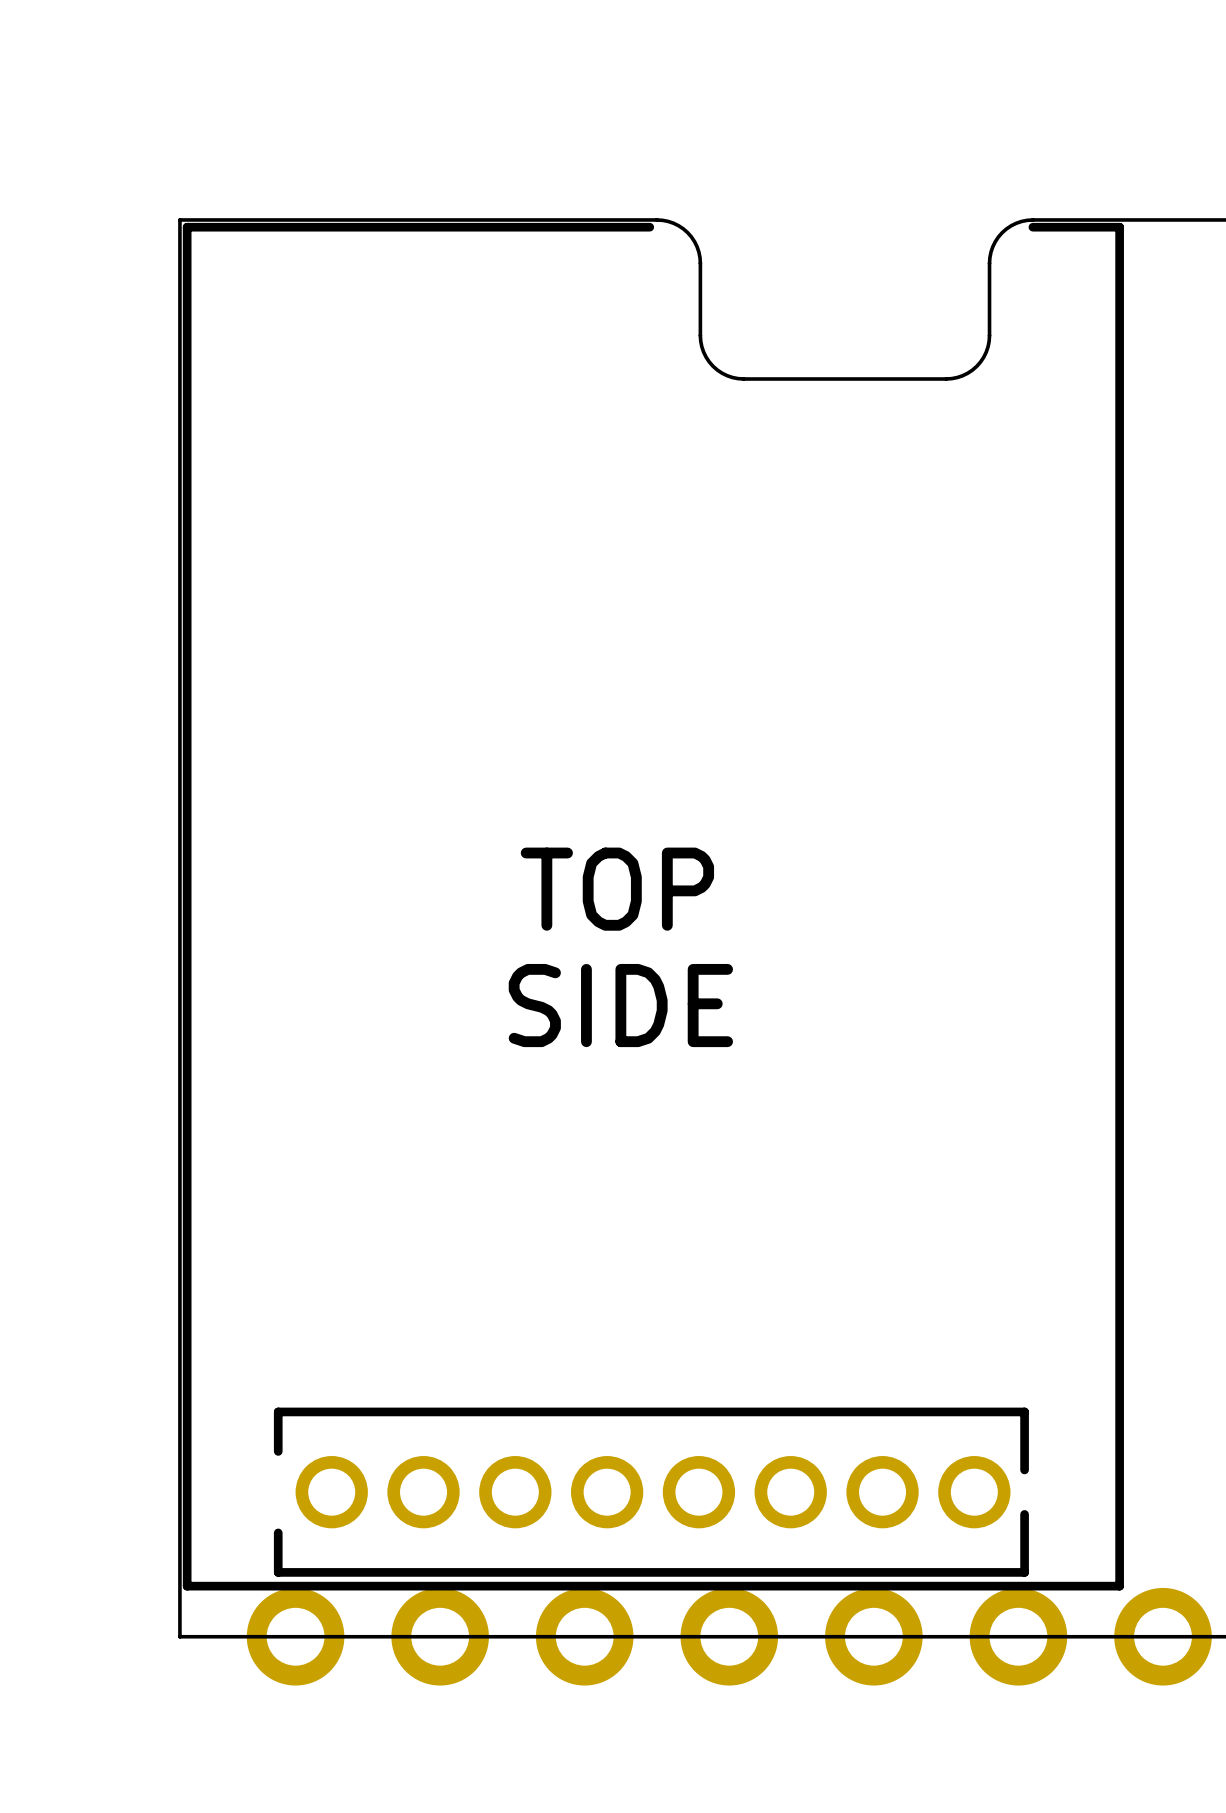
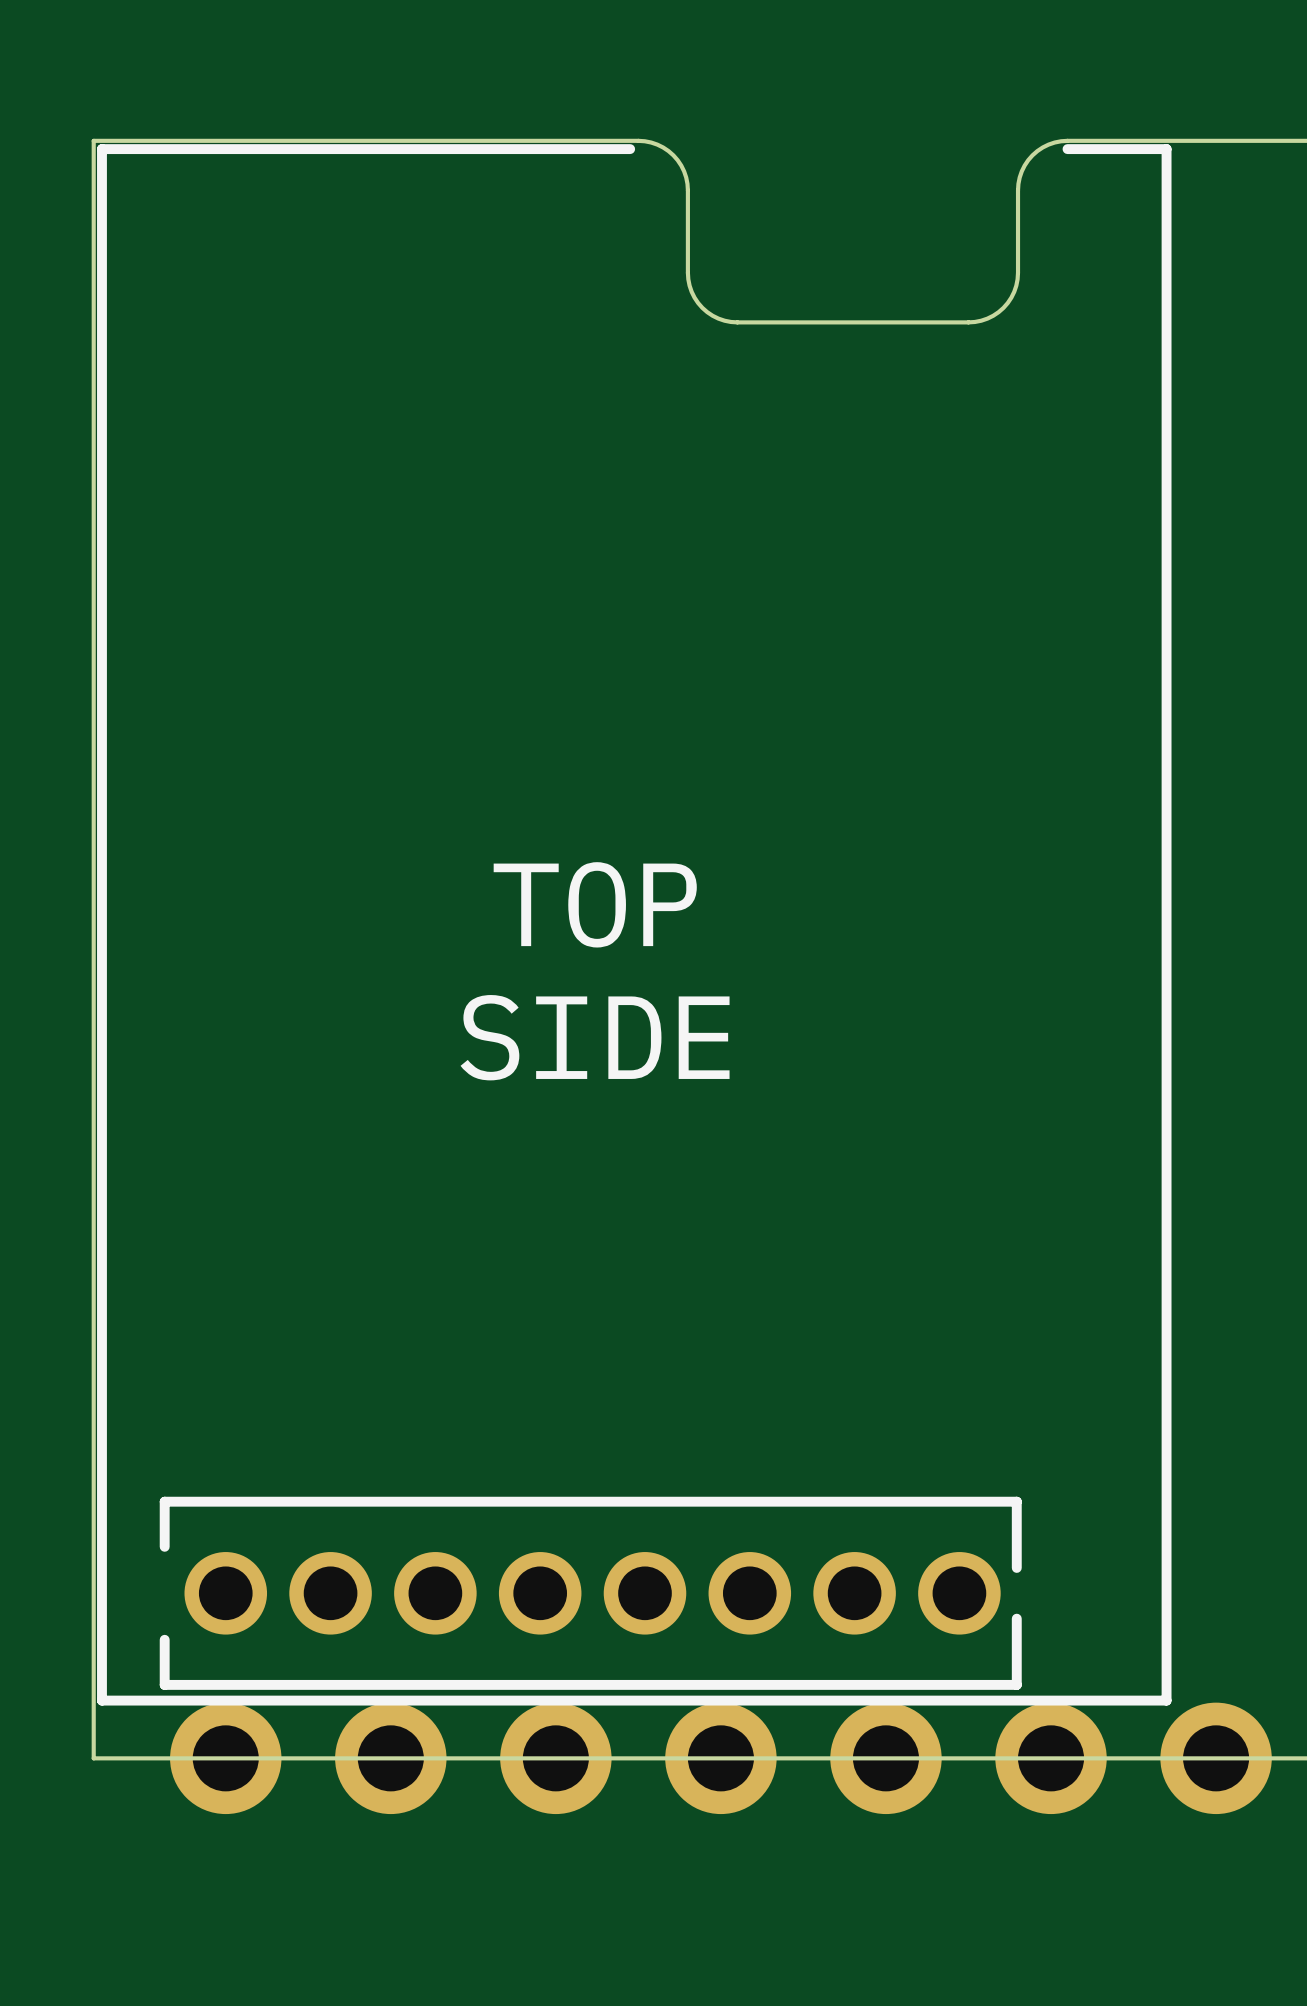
part position: (651, 1492) -> (590, 1593)

